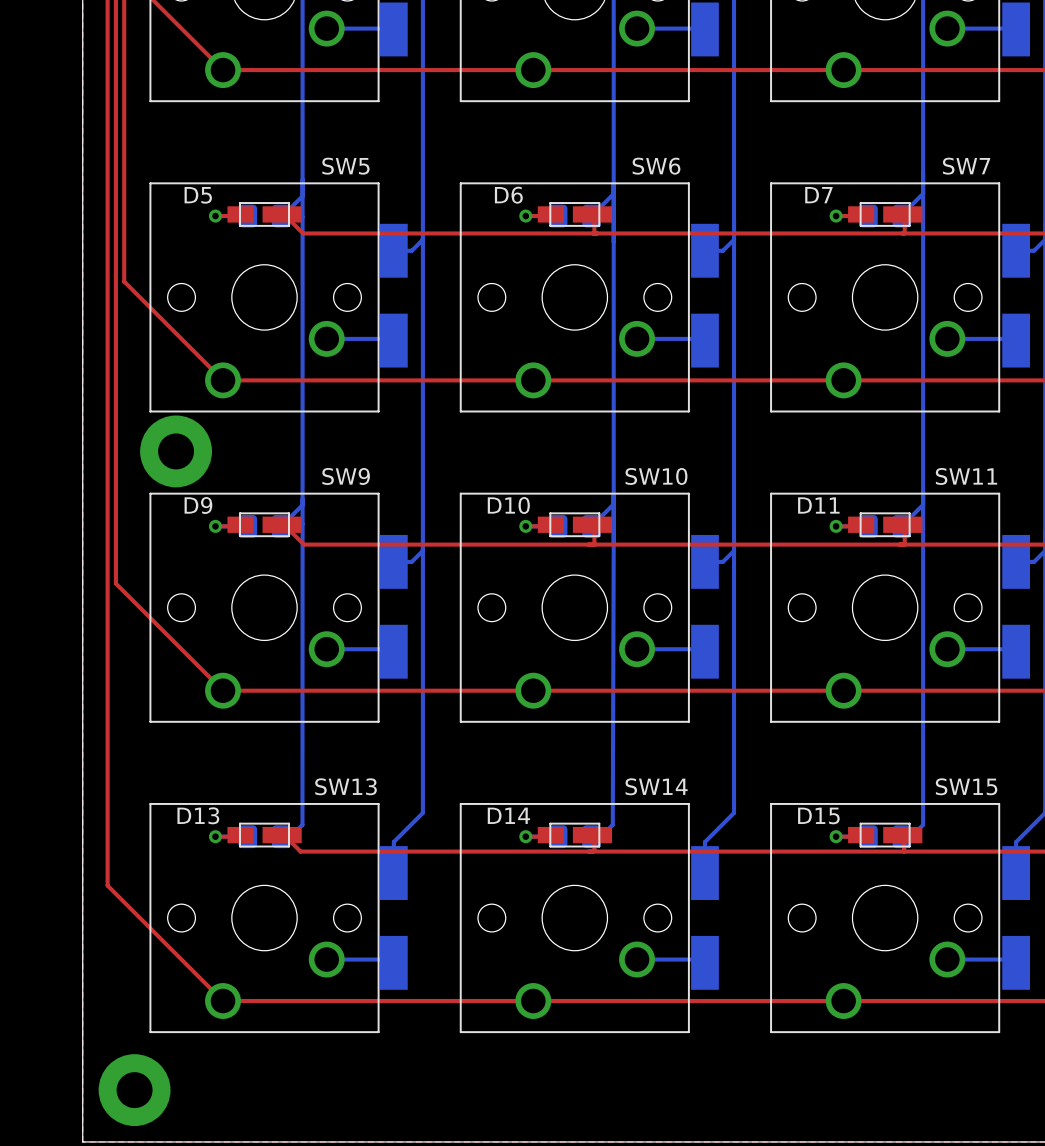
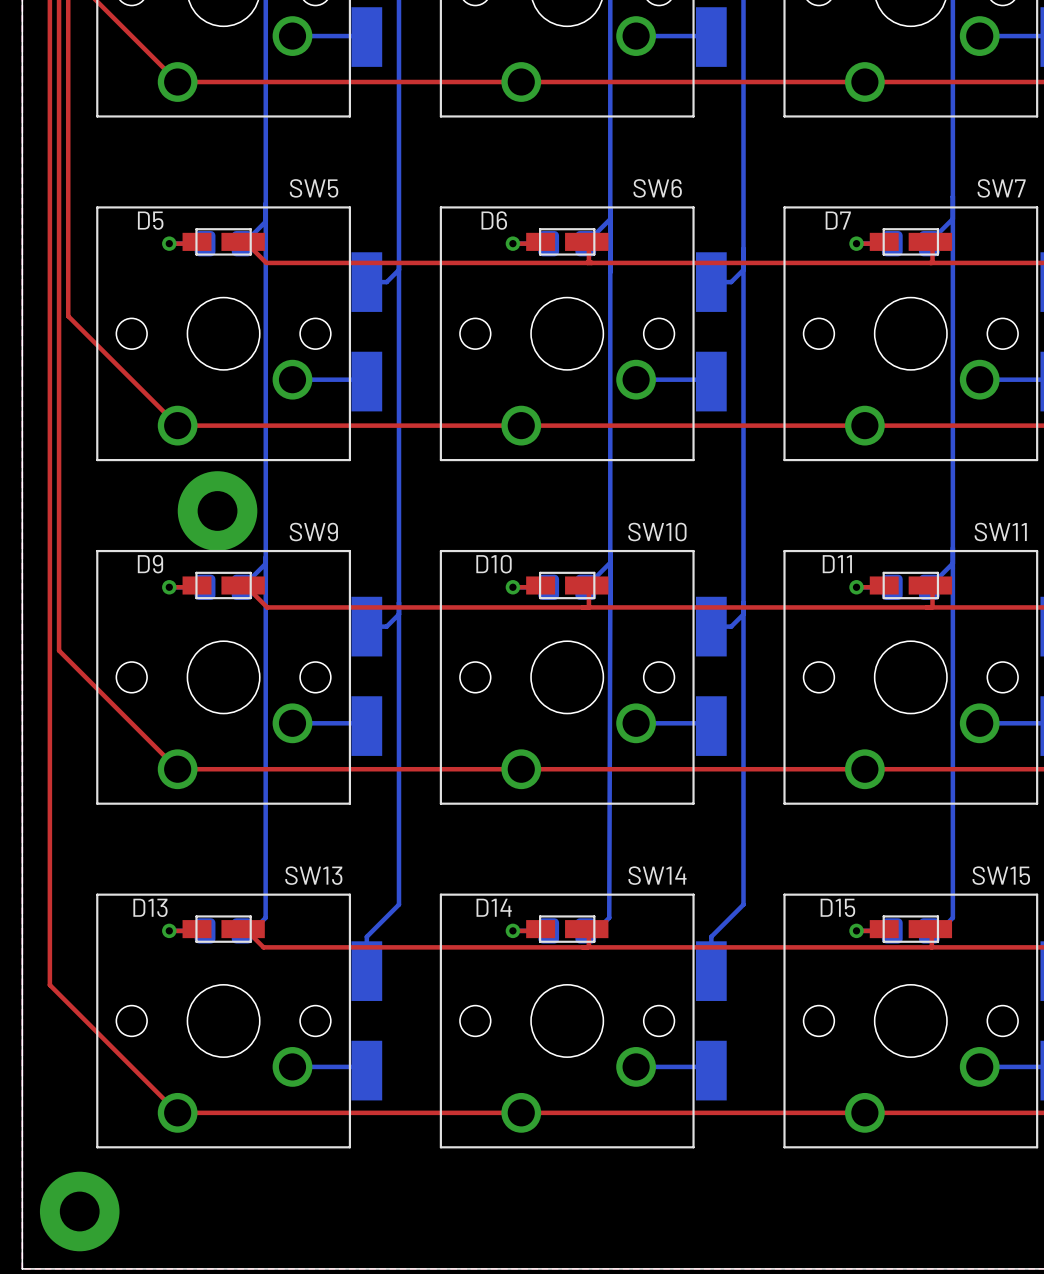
part position: (176, 451) -> (217, 510)

